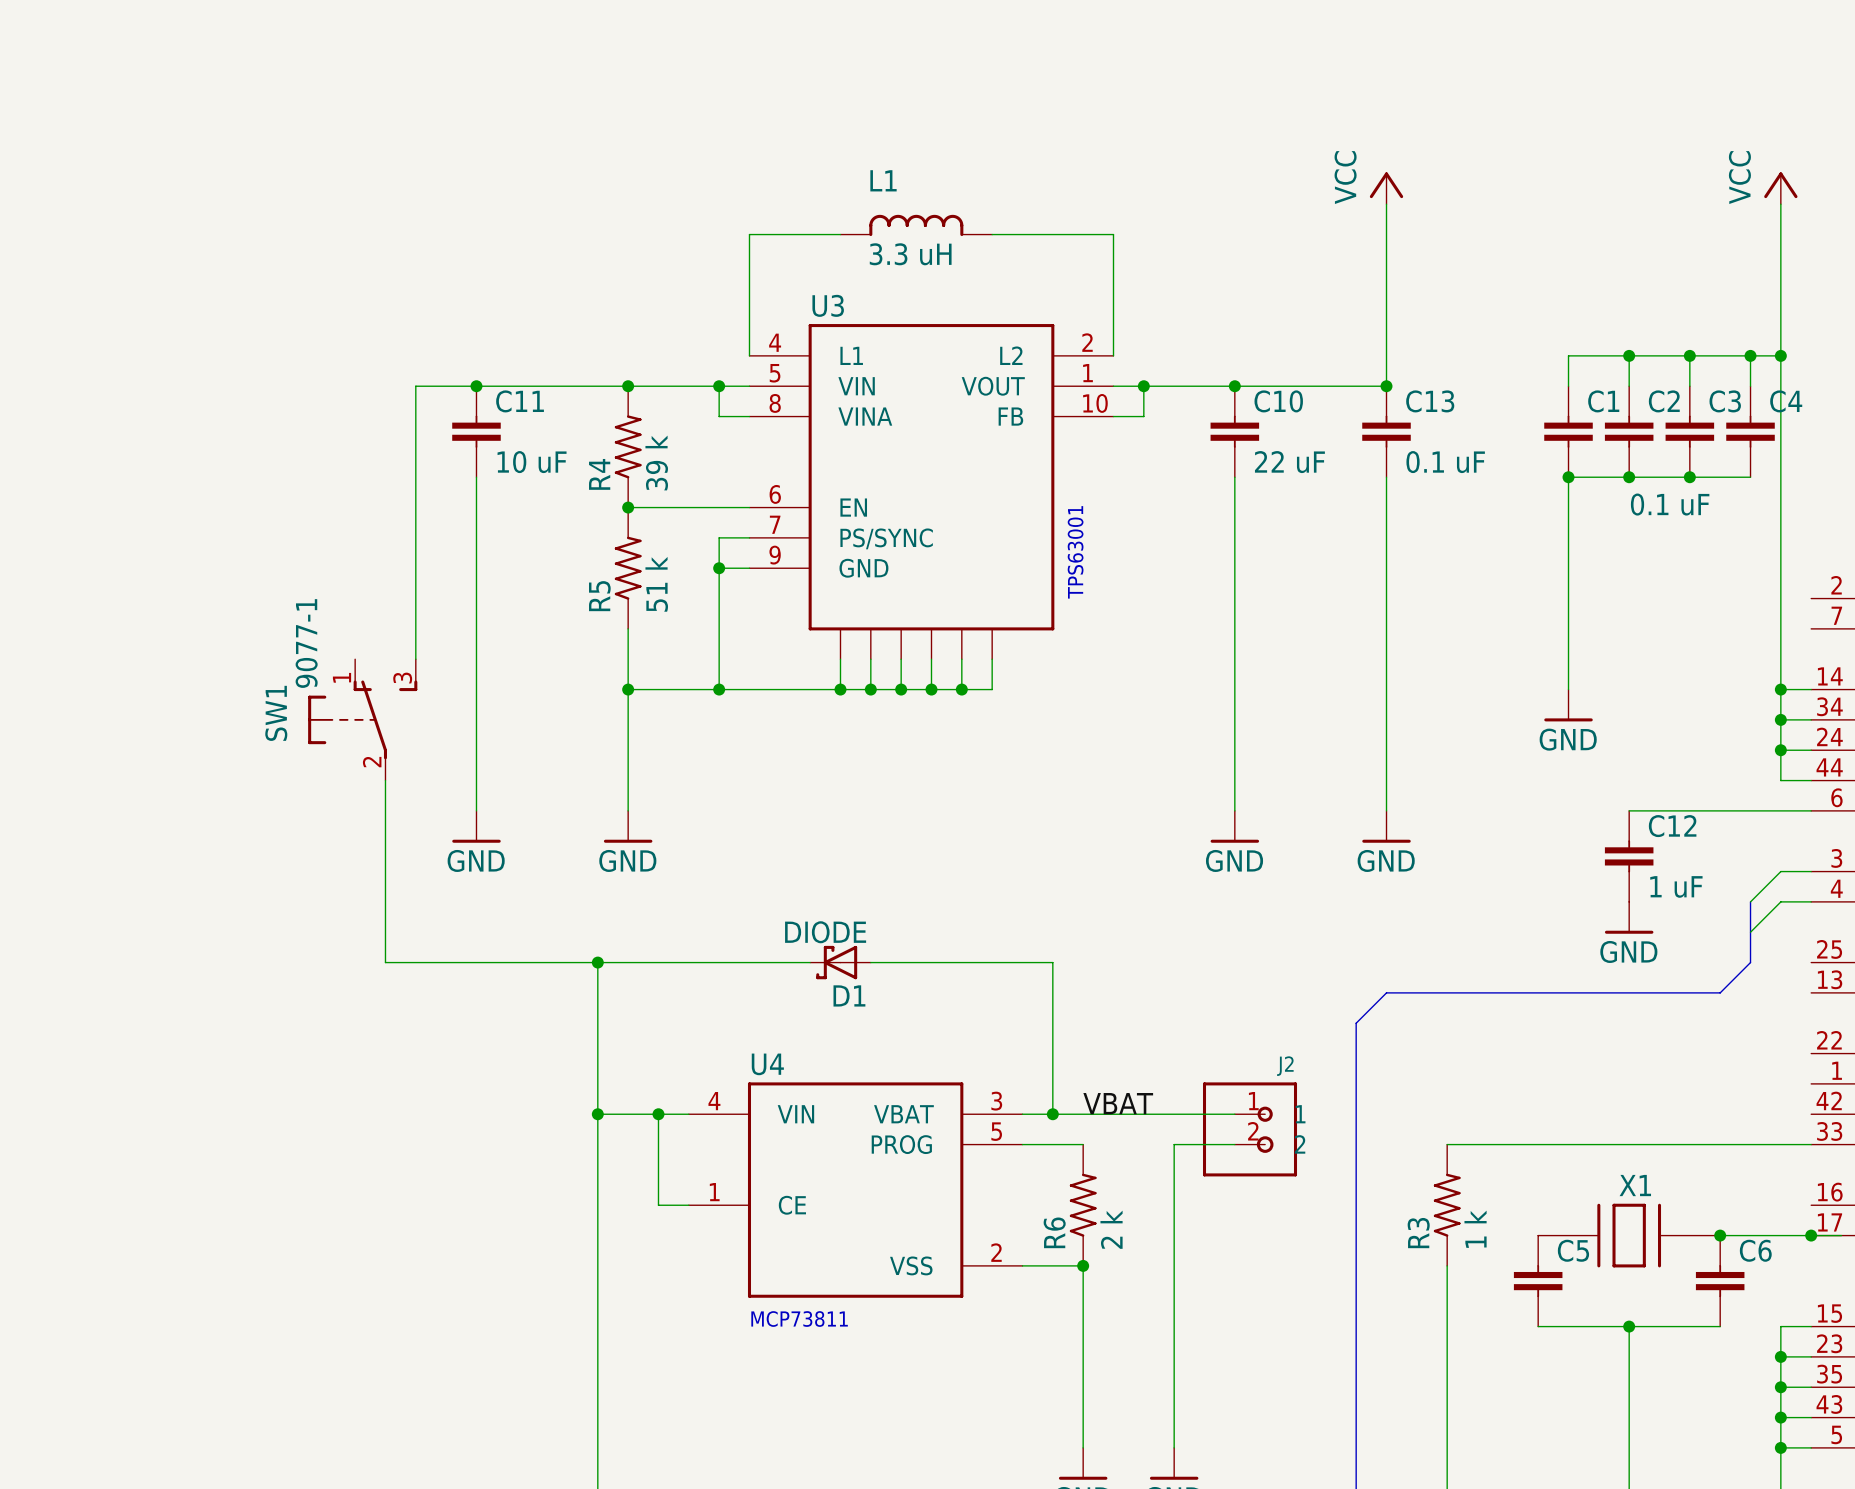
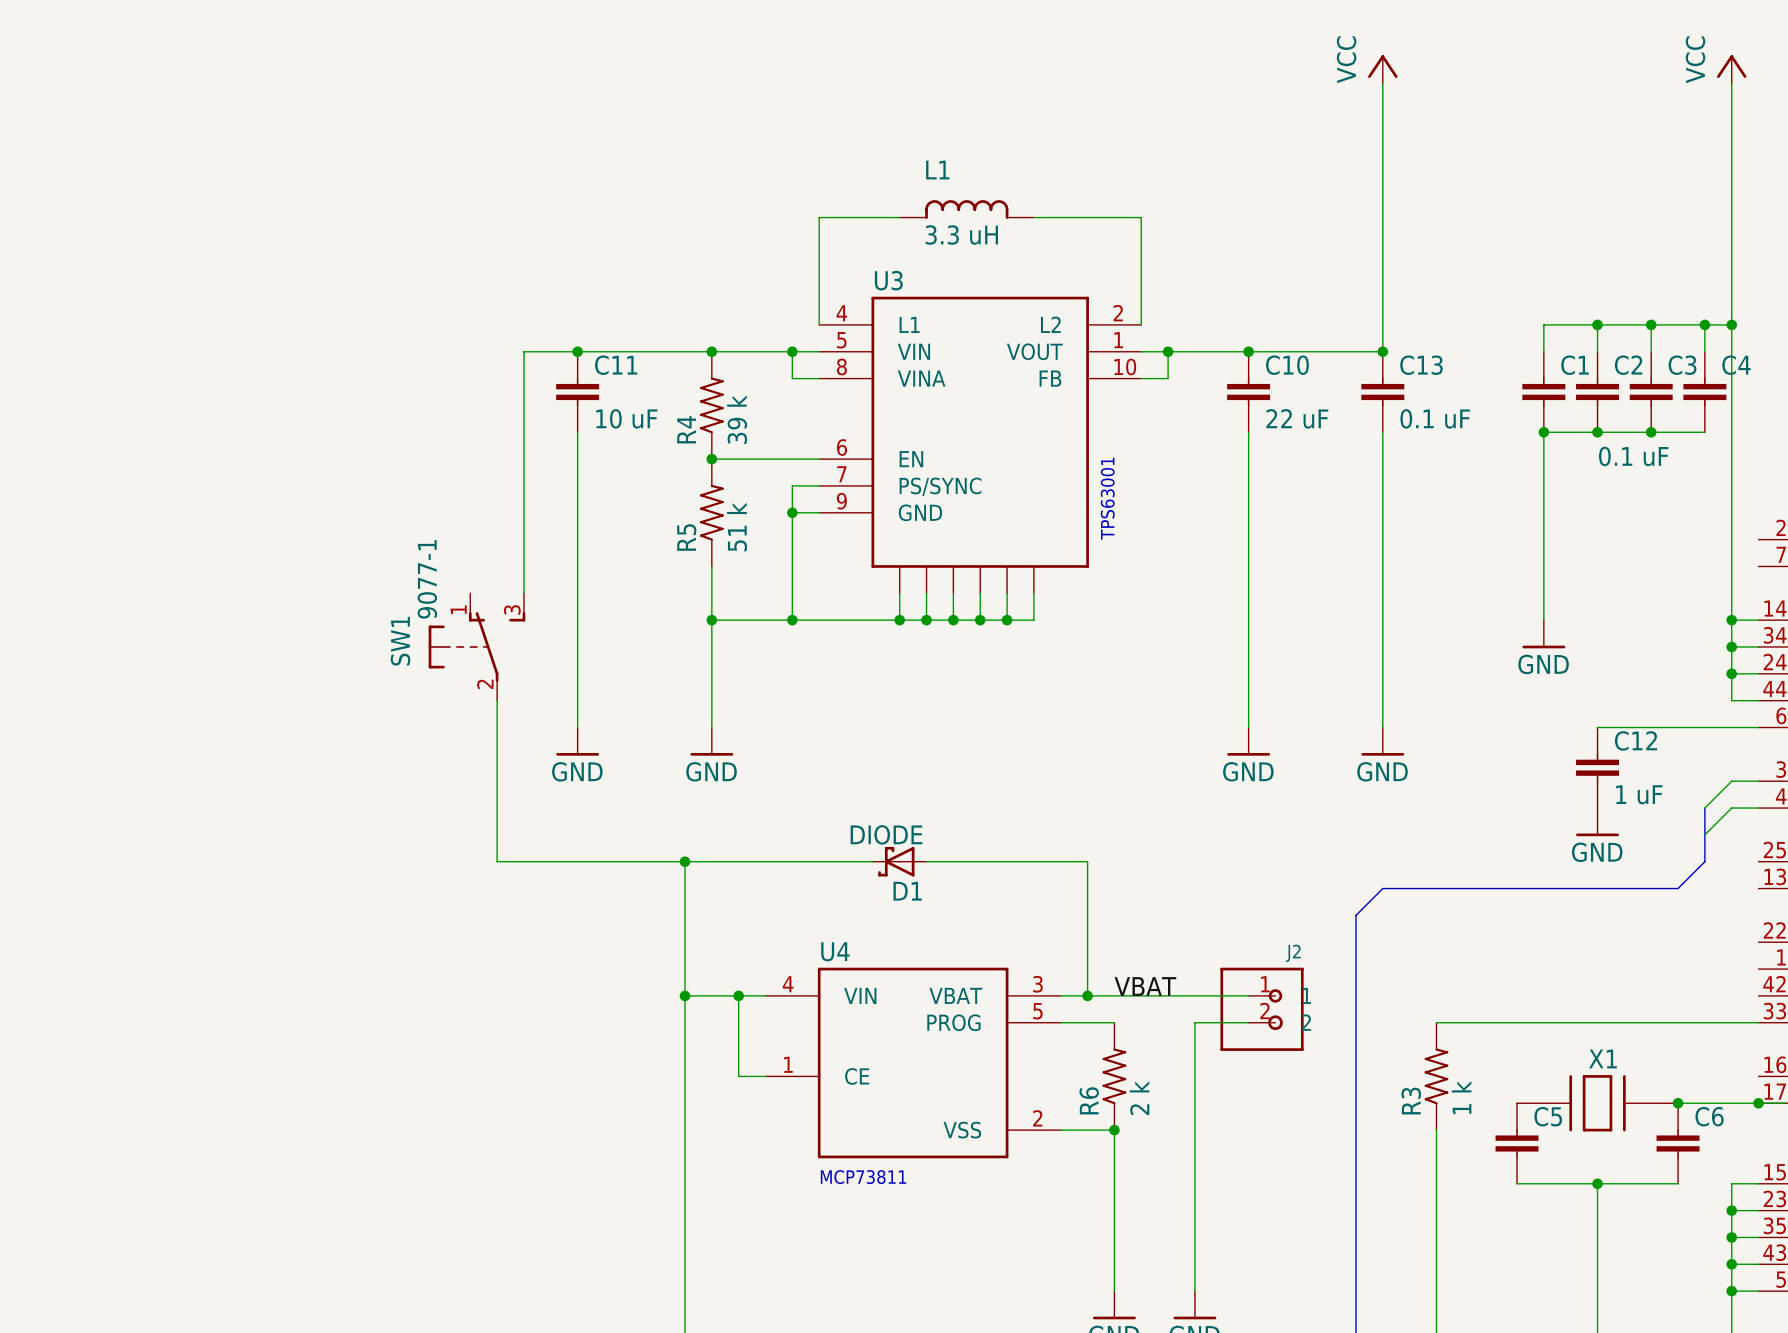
wire: none -> (1382, 83) (1382, 190)
wire: none -> (1731, 83) (1731, 190)
power symbol position: VCC (1386, 188) -> VCC (1382, 69)
power symbol position: VCC (1780, 188) -> VCC (1731, 69)

